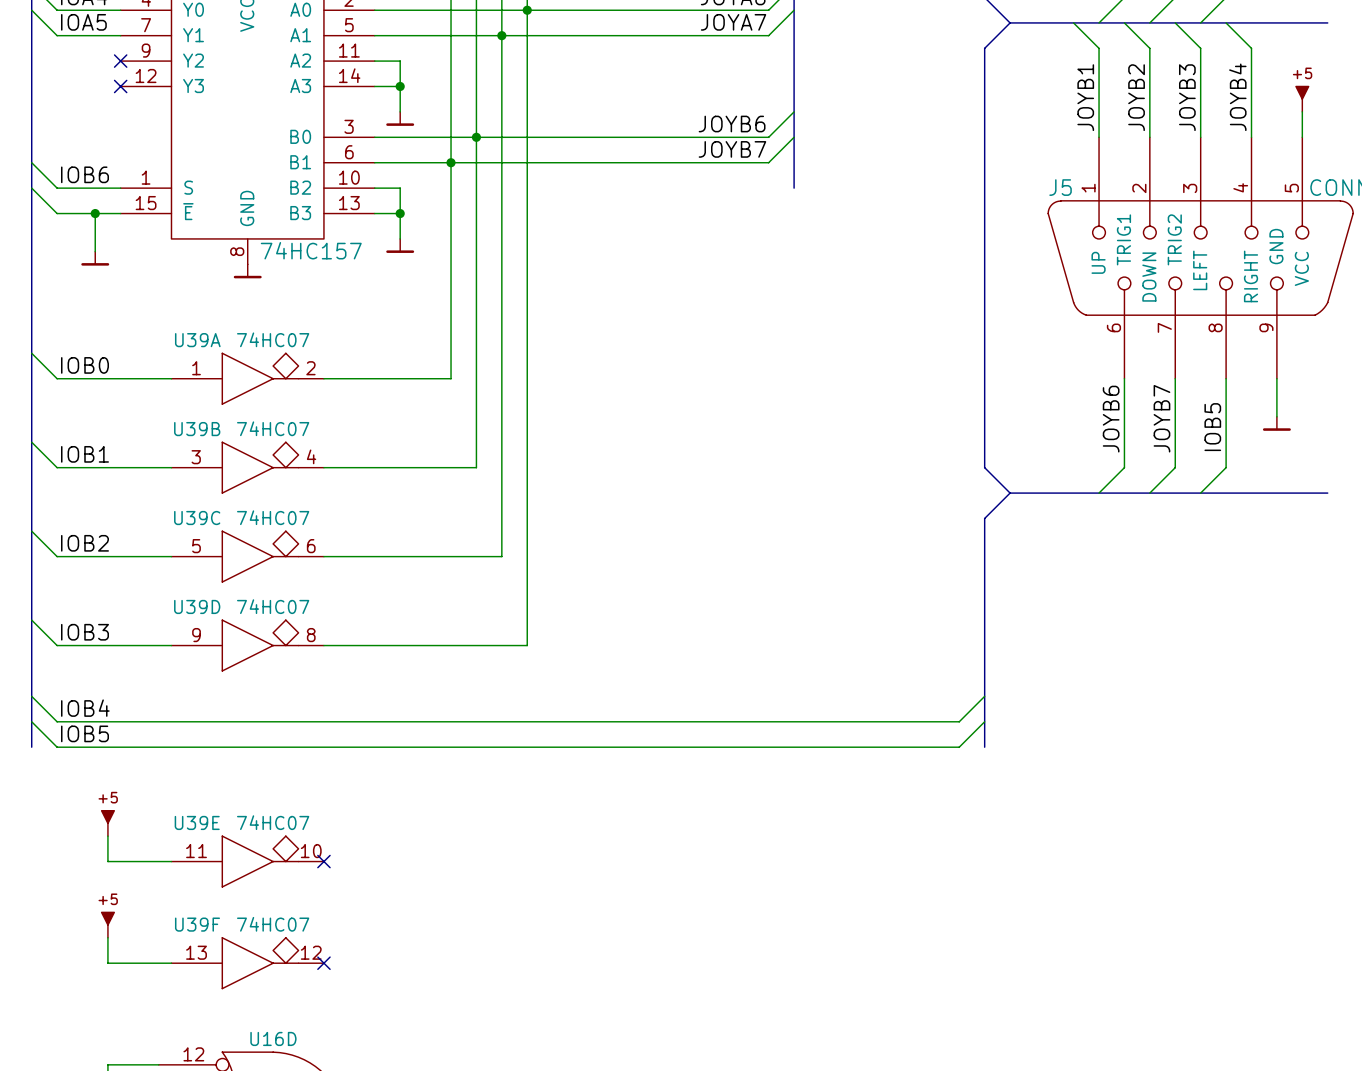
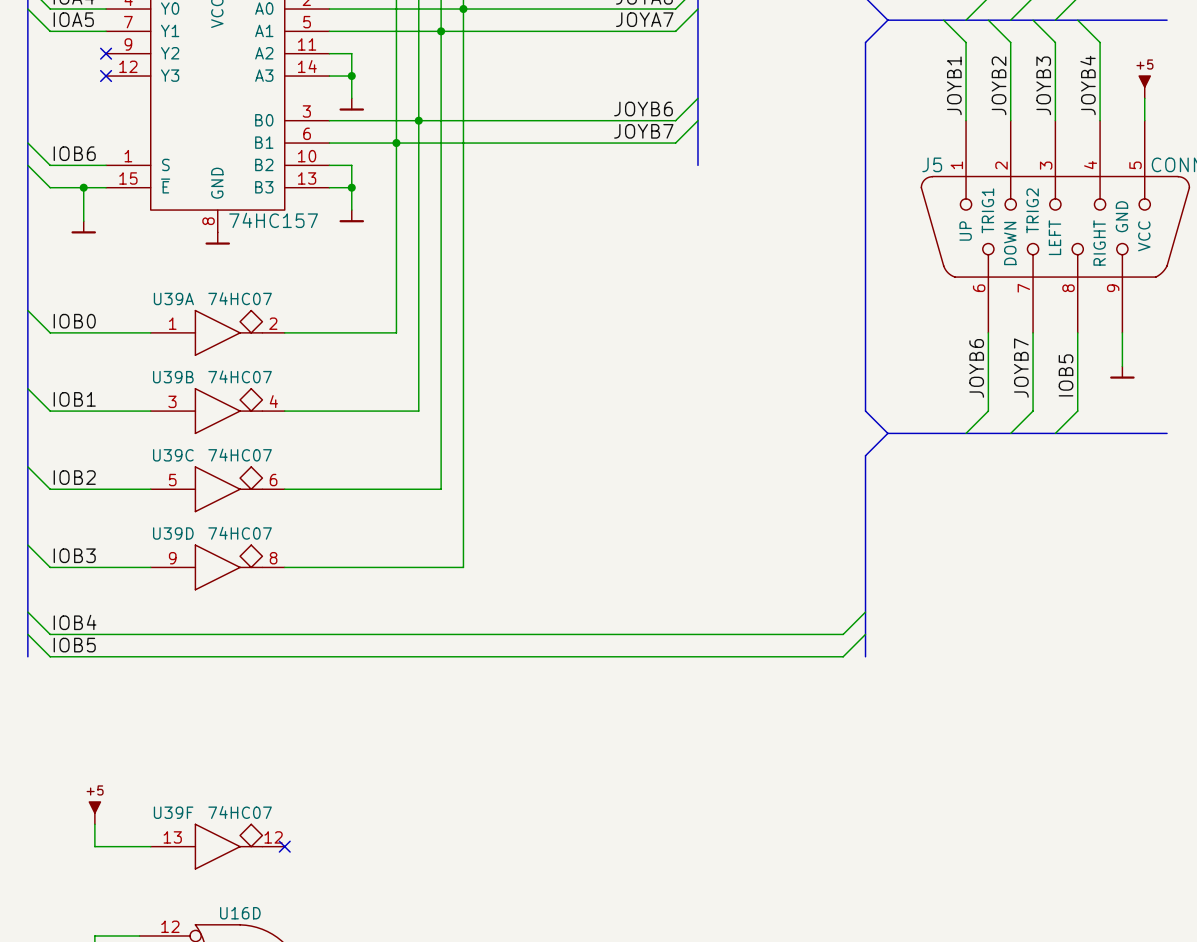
power symbol: (107, 823) -> none
wire: (107, 836) (107, 861) (171, 861) -> none
U39E: 74HC07 (247, 861) -> none
no-connect mark: (323, 861) -> none

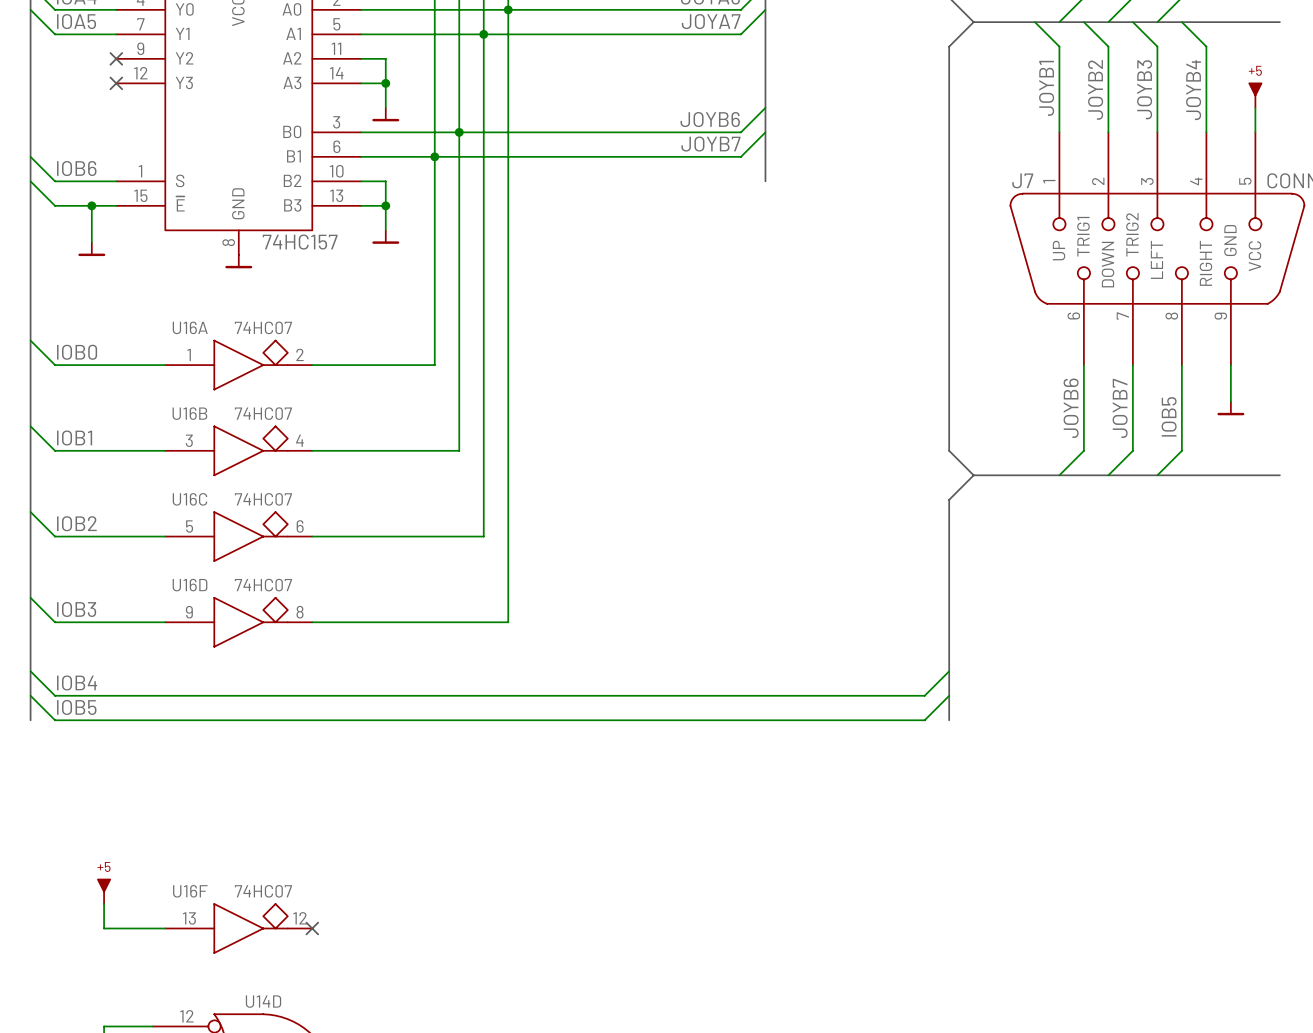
J5 name: J5 (932, 164) -> J7 (1022, 180)
U39A name: U39A (173, 298) -> U16A (190, 327)
U39B name: U39B (173, 377) -> U16B (189, 413)
U39C name: U39C (173, 455) -> U16C (189, 499)
U39D name: U39D (173, 533) -> U16D (190, 585)
U39F name: U39F (173, 812) -> U16F (190, 891)
U16D name: U16D (240, 913) -> U14D (263, 1001)

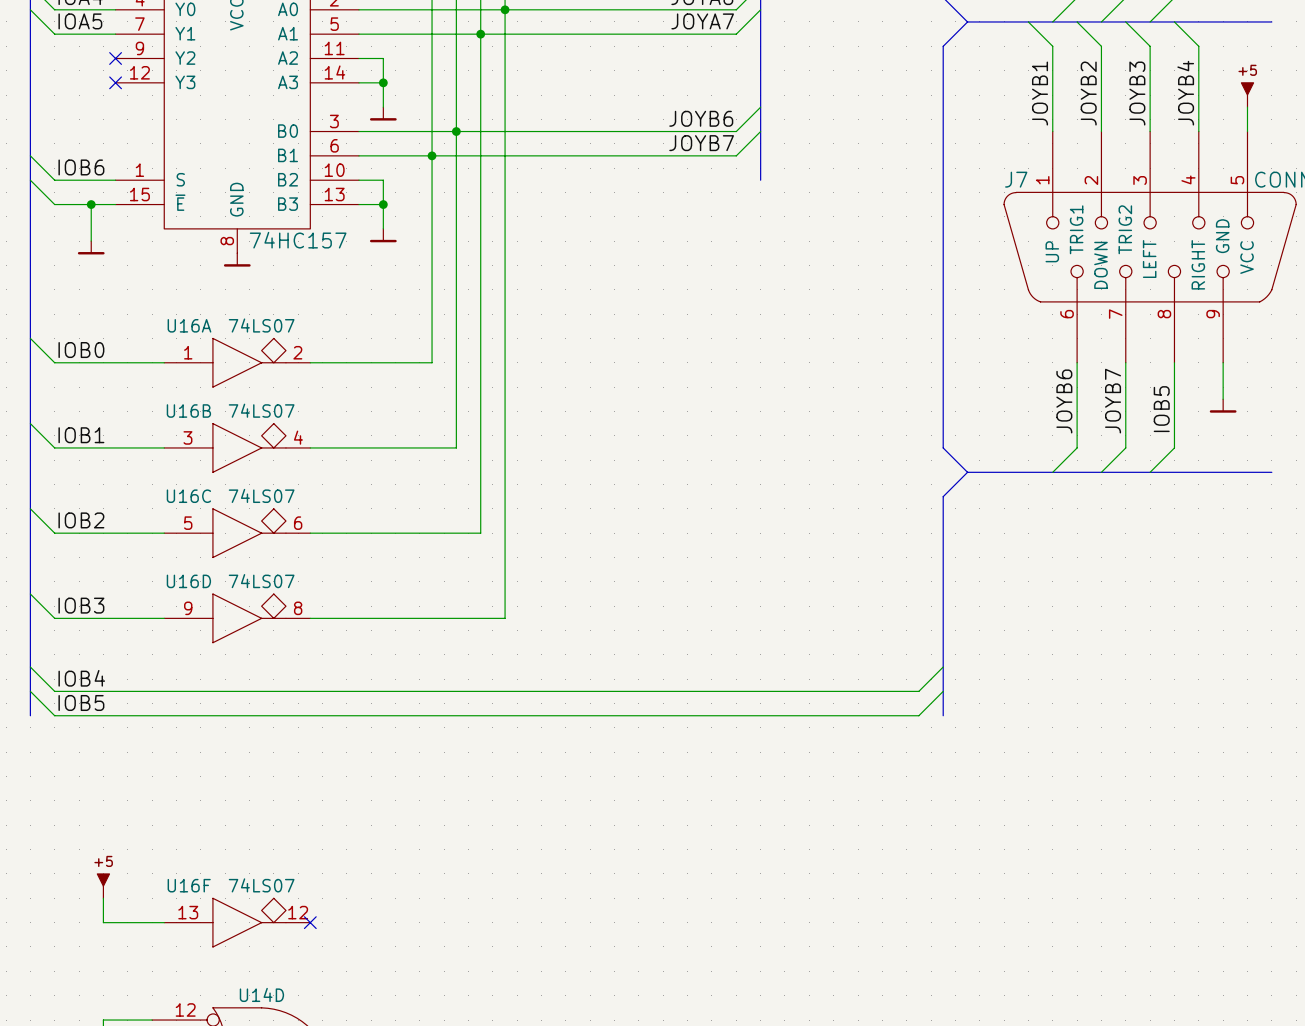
U16A value: 74HC07 (263, 327) -> 74LS07 (261, 325)
U16B value: 74HC07 (263, 413) -> 74LS07 (261, 410)
U16C value: 74HC07 (263, 499) -> 74LS07 (261, 495)
U16D value: 74HC07 (263, 585) -> 74LS07 (261, 581)
U16F value: 74HC07 (263, 891) -> 74LS07 (261, 885)

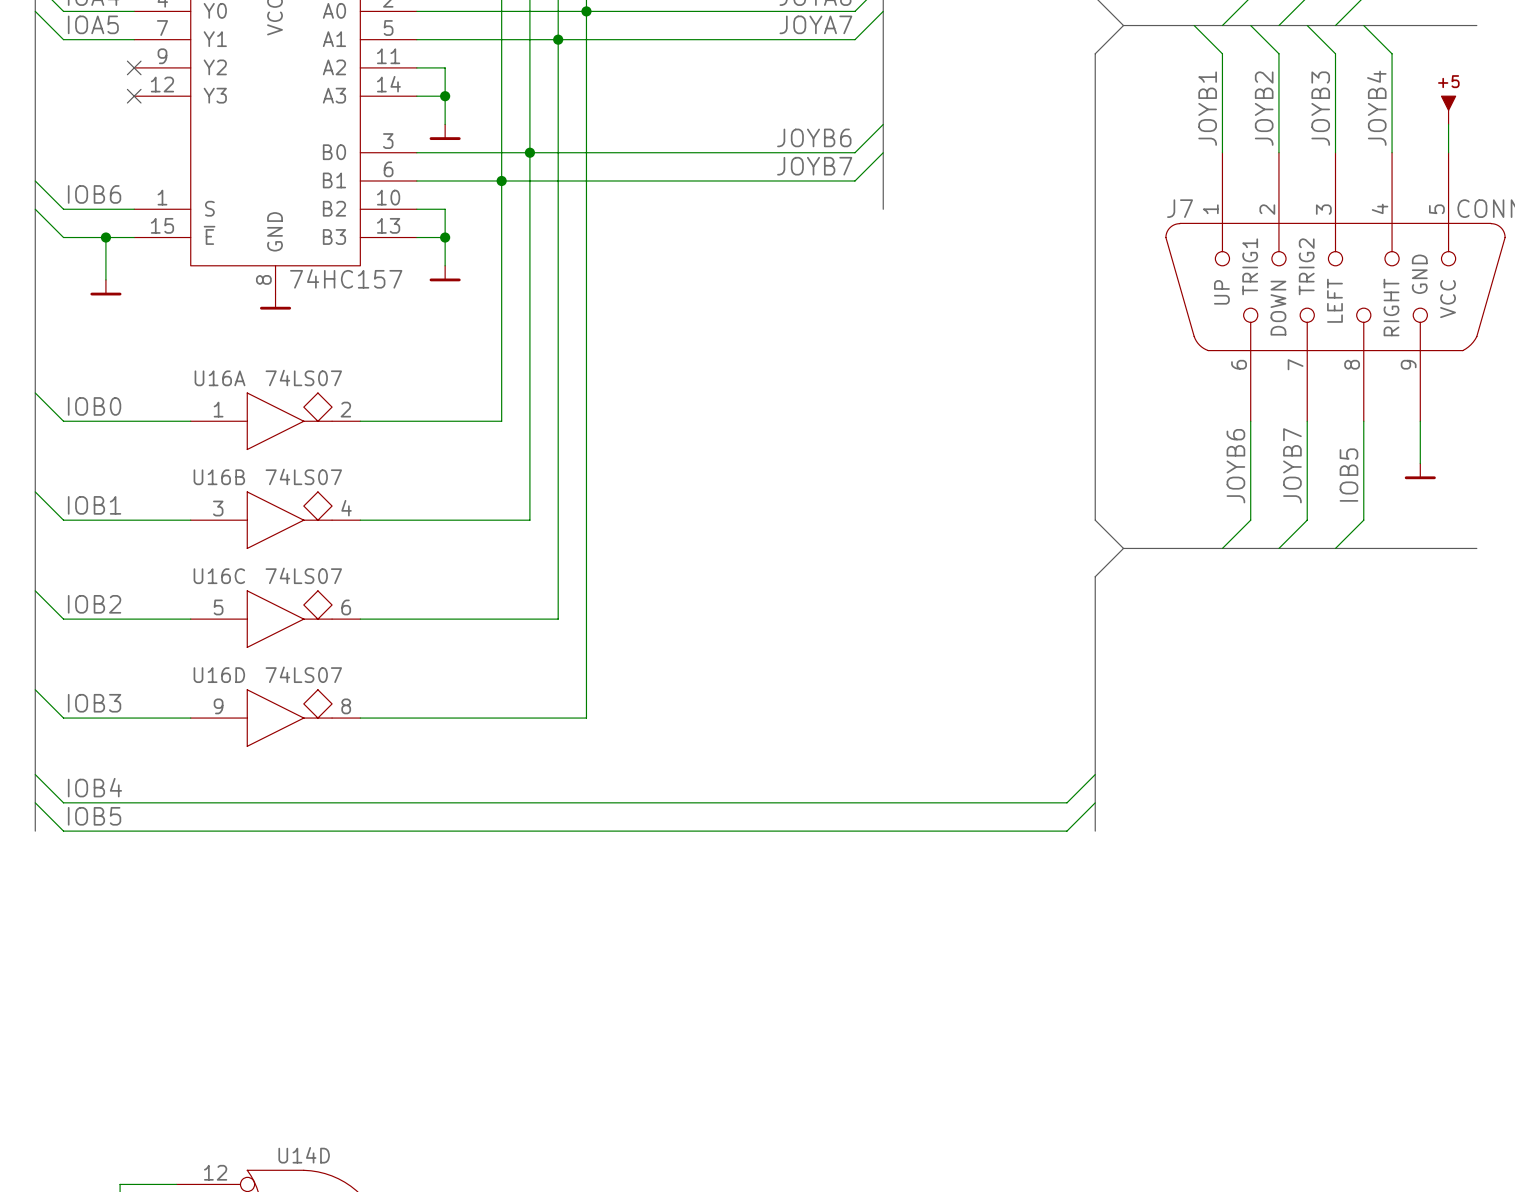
power symbol: (103, 886) -> none
wire: (103, 898) (103, 922) (164, 922) -> none
U16F: 74LS07 (237, 922) -> none
no-connect mark: (310, 922) -> none

